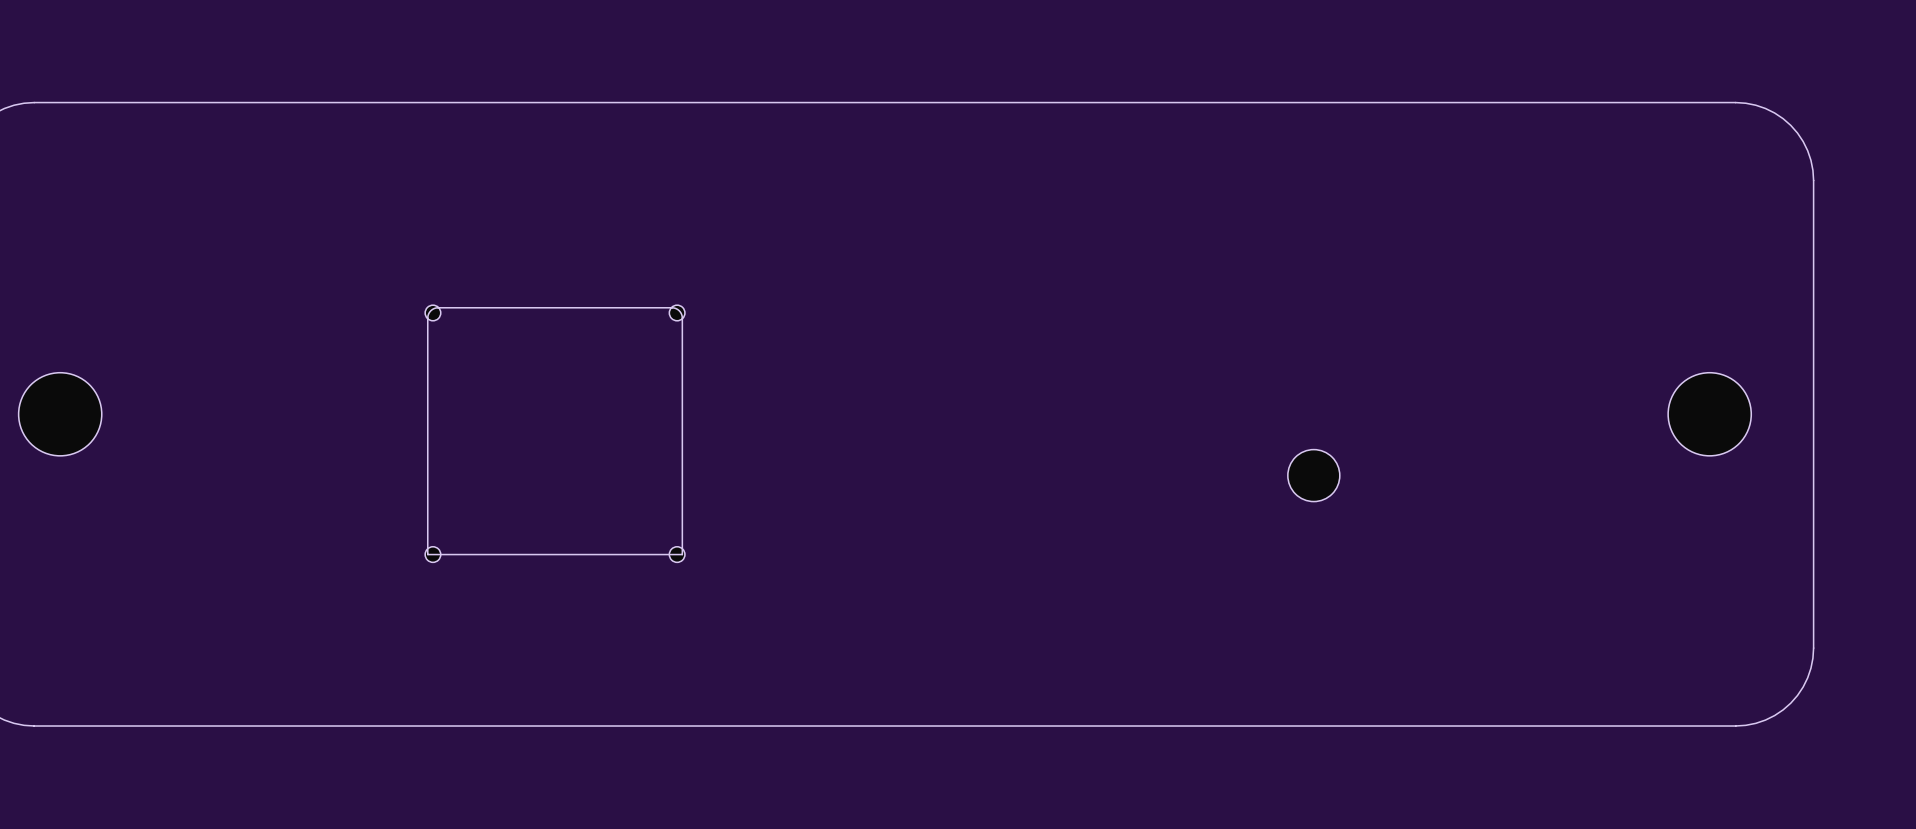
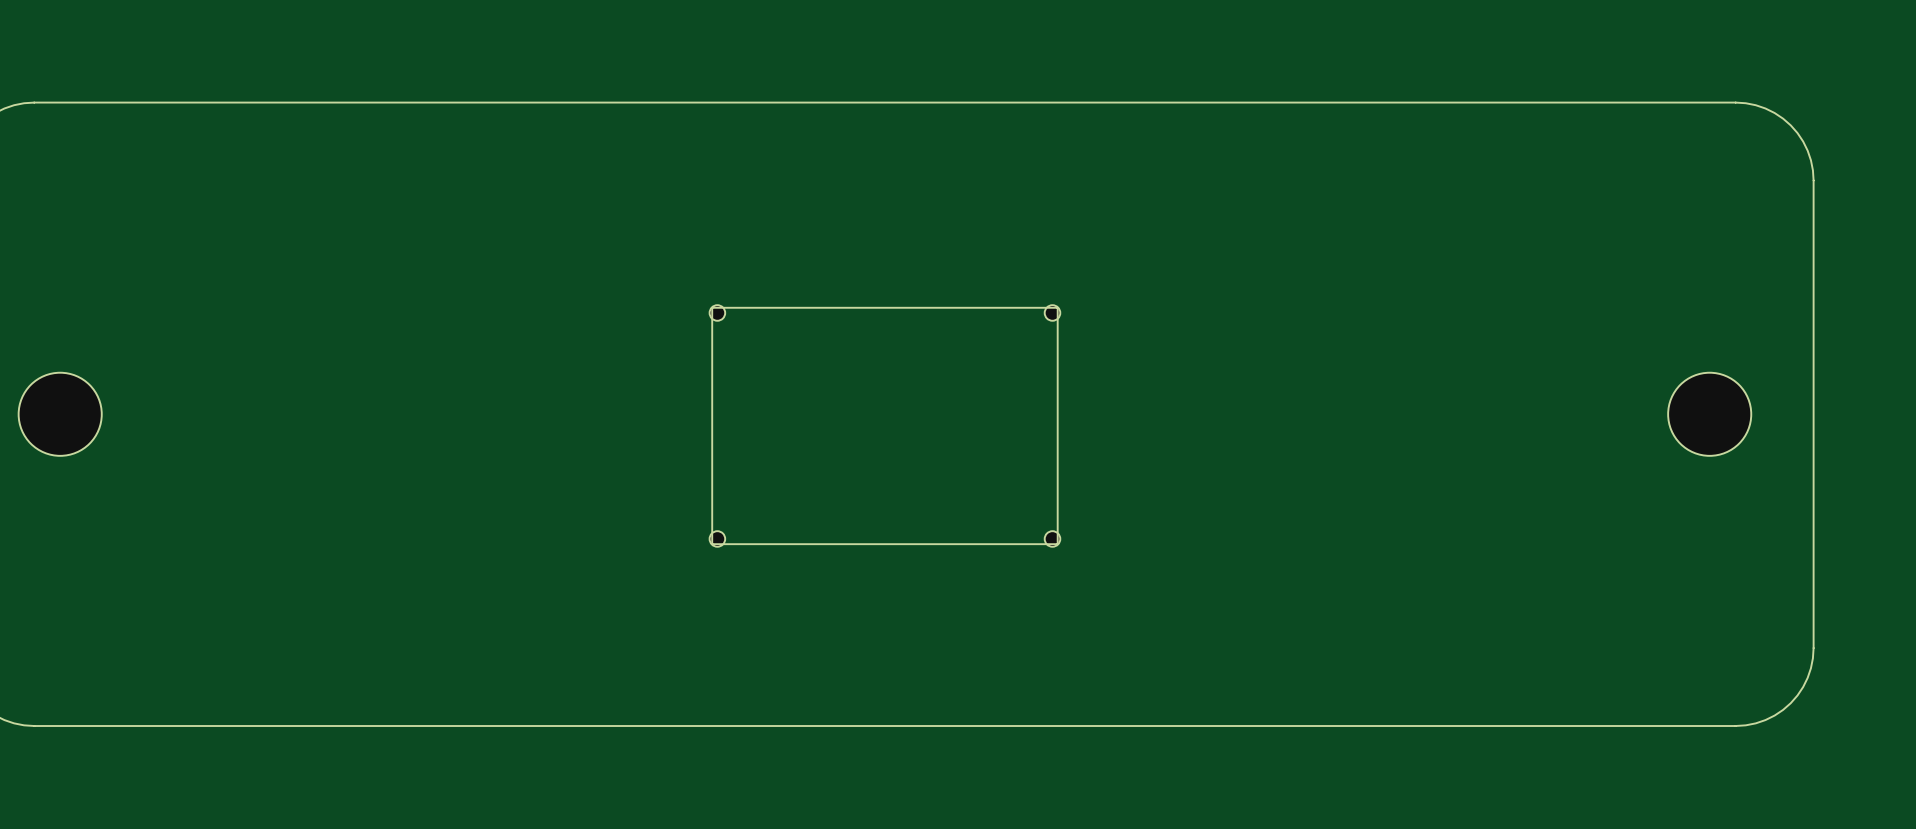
board edge: (438, 307) (671, 307) (679, 310) (682, 318) (682, 554) (427, 554) (427, 318) (430, 310) (438, 307) -> none
board edge: none -> (712, 307) (712, 544) (1057, 544) (1057, 307) (712, 307)
hole: (432, 312) -> none
hole position: (677, 312) -> (717, 312)
hole: none -> (1052, 312)
hole: (1313, 475) -> none
hole: none -> (1052, 538)
hole: (432, 554) -> none
hole position: (677, 554) -> (717, 538)

